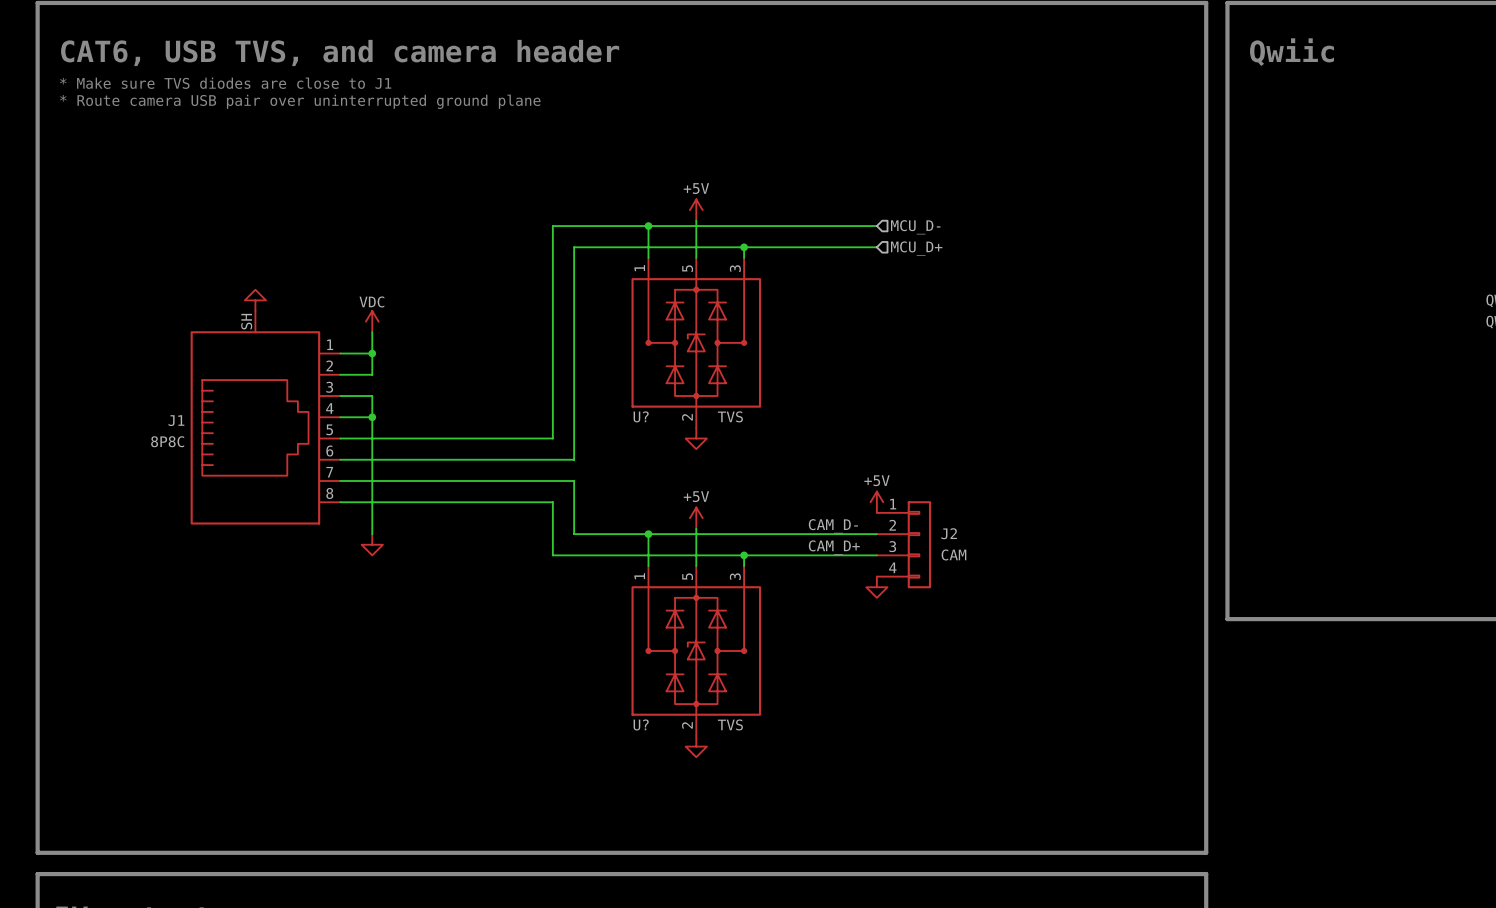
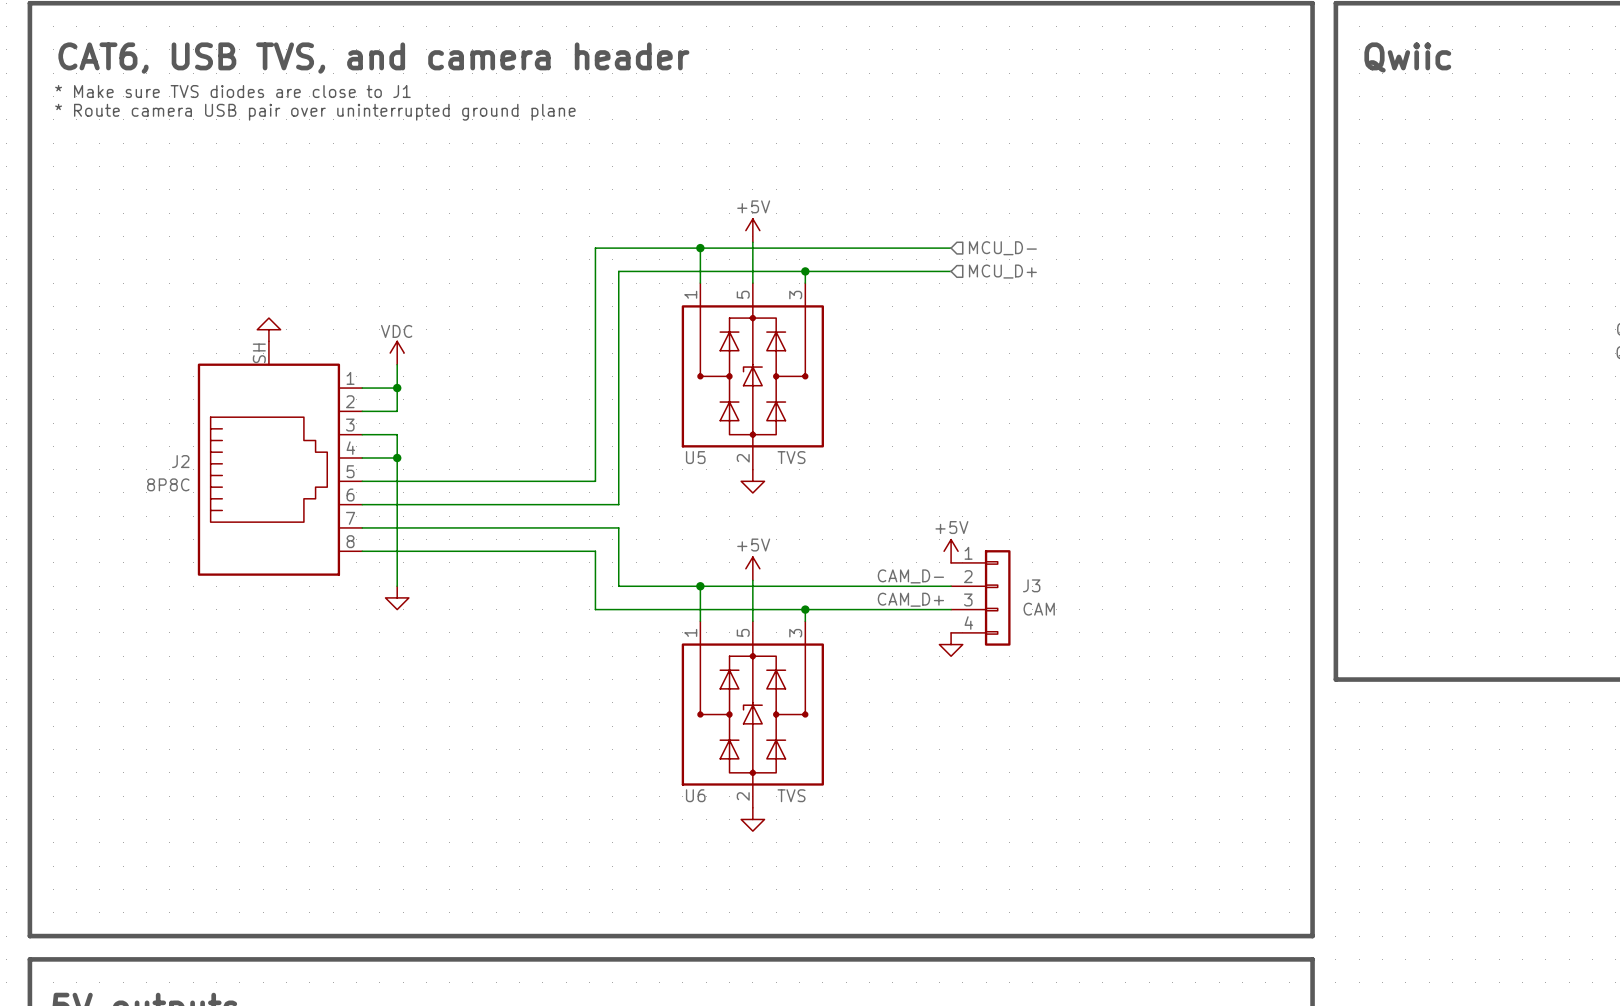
U? name: U? (641, 416) -> U5 (695, 457)
J1 name: J1 (176, 420) -> J2 (180, 461)
J2 name: J2 (949, 533) -> J3 (1031, 585)
U? name: U? (641, 724) -> U6 (695, 795)

